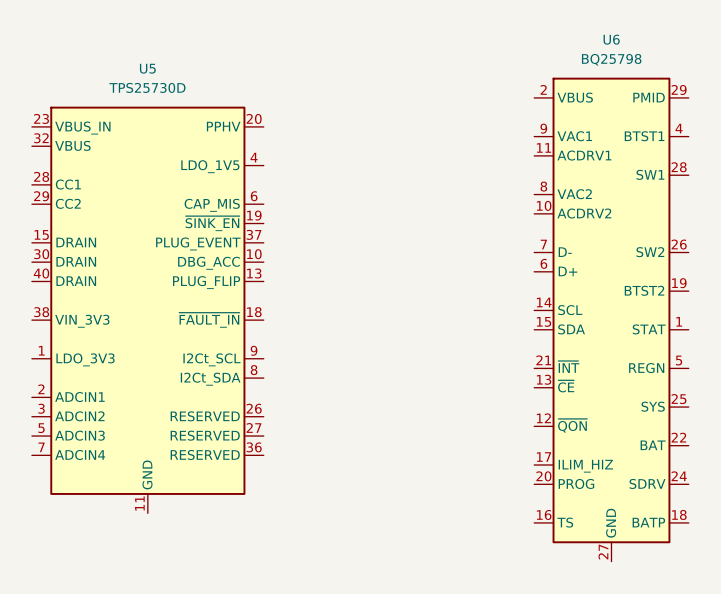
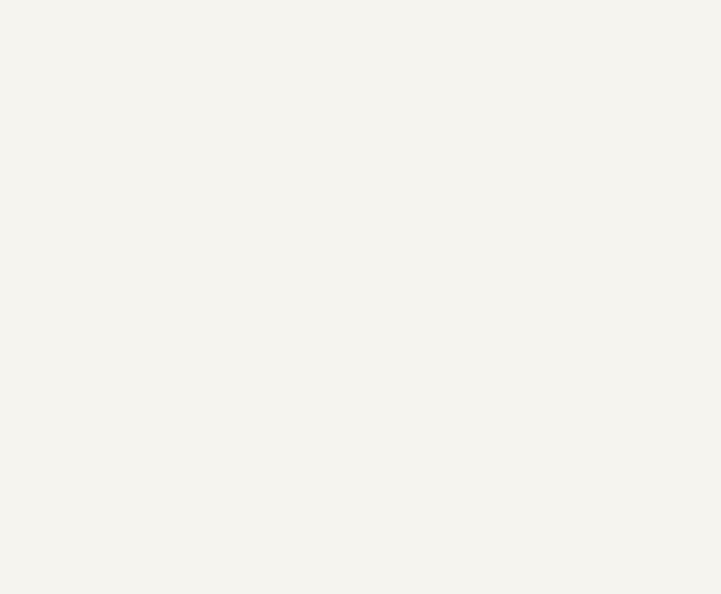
U5: TPS25730D (147, 309) -> none
U6: BQ25798 (611, 319) -> none

